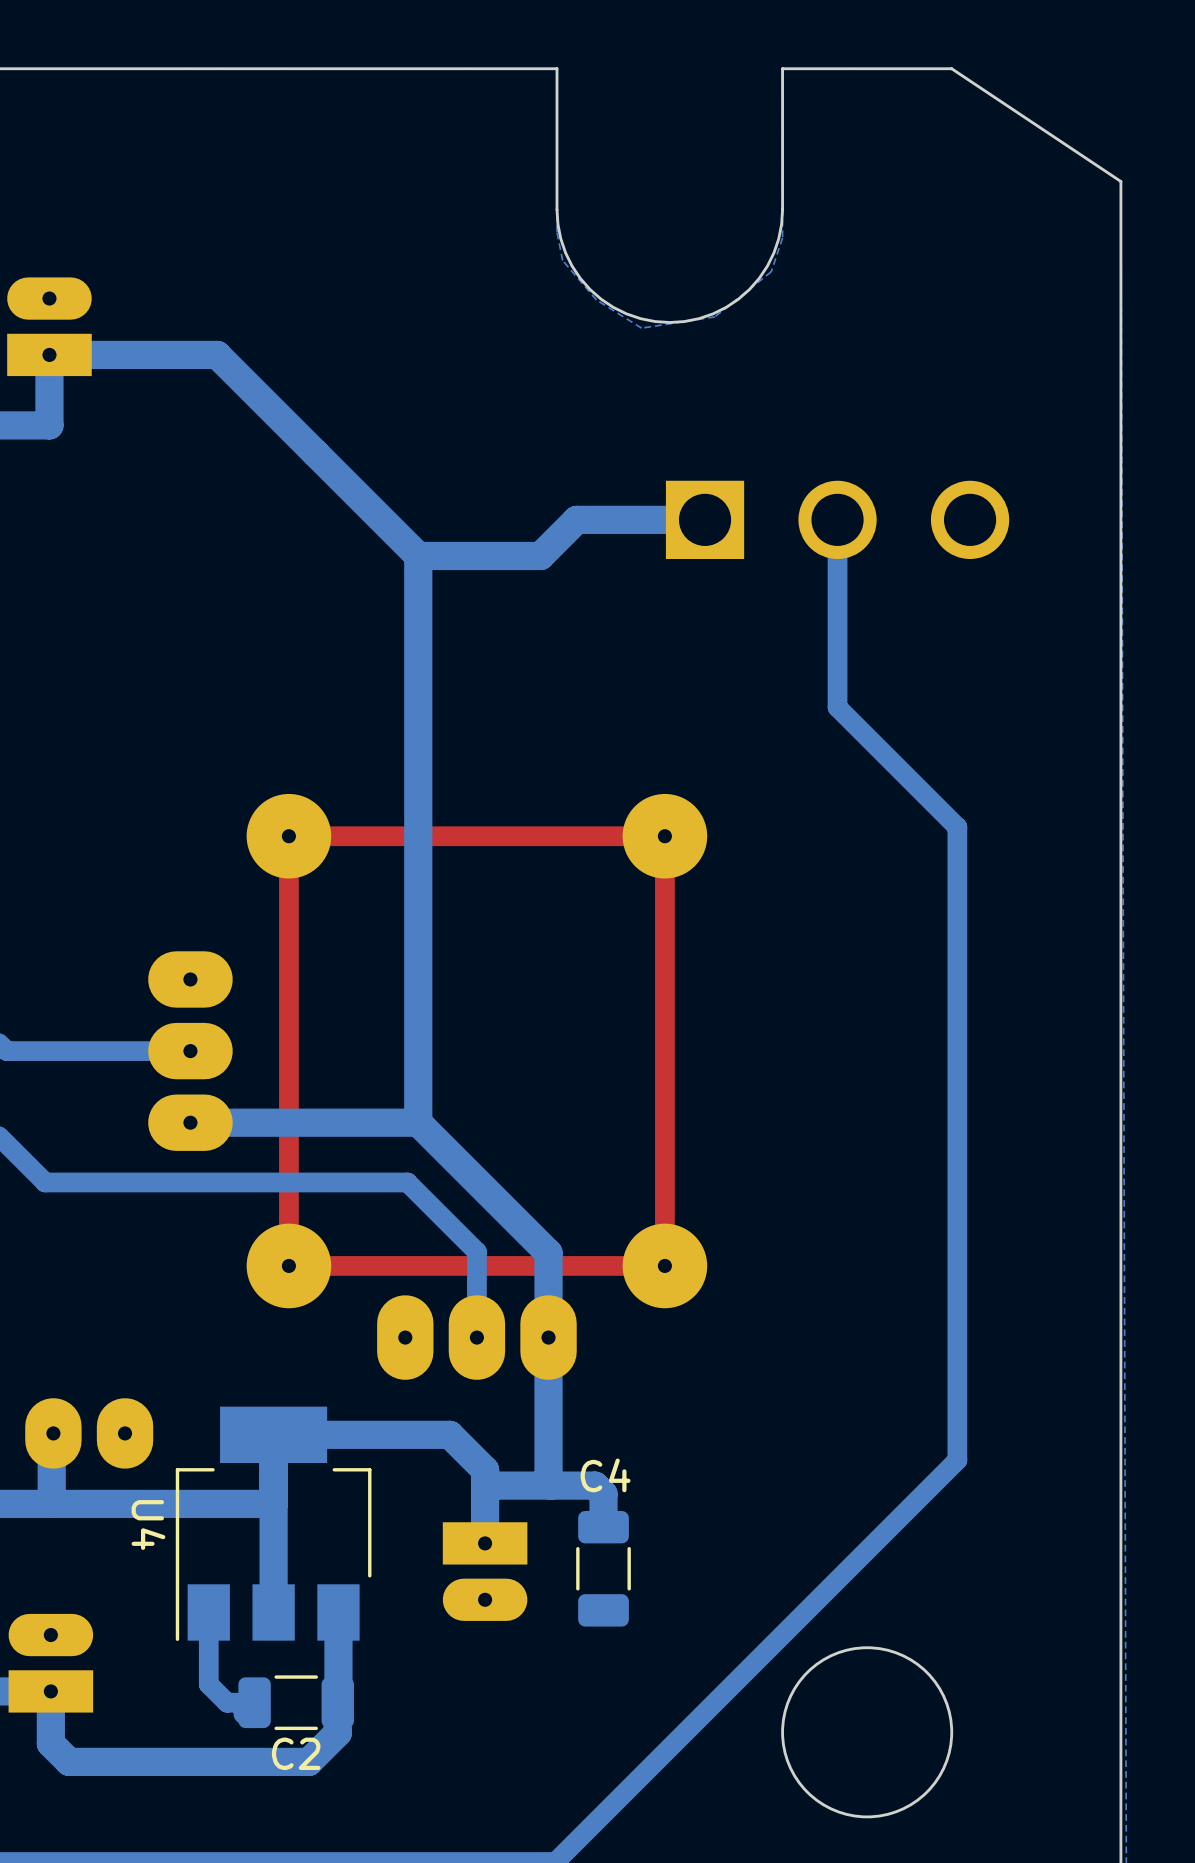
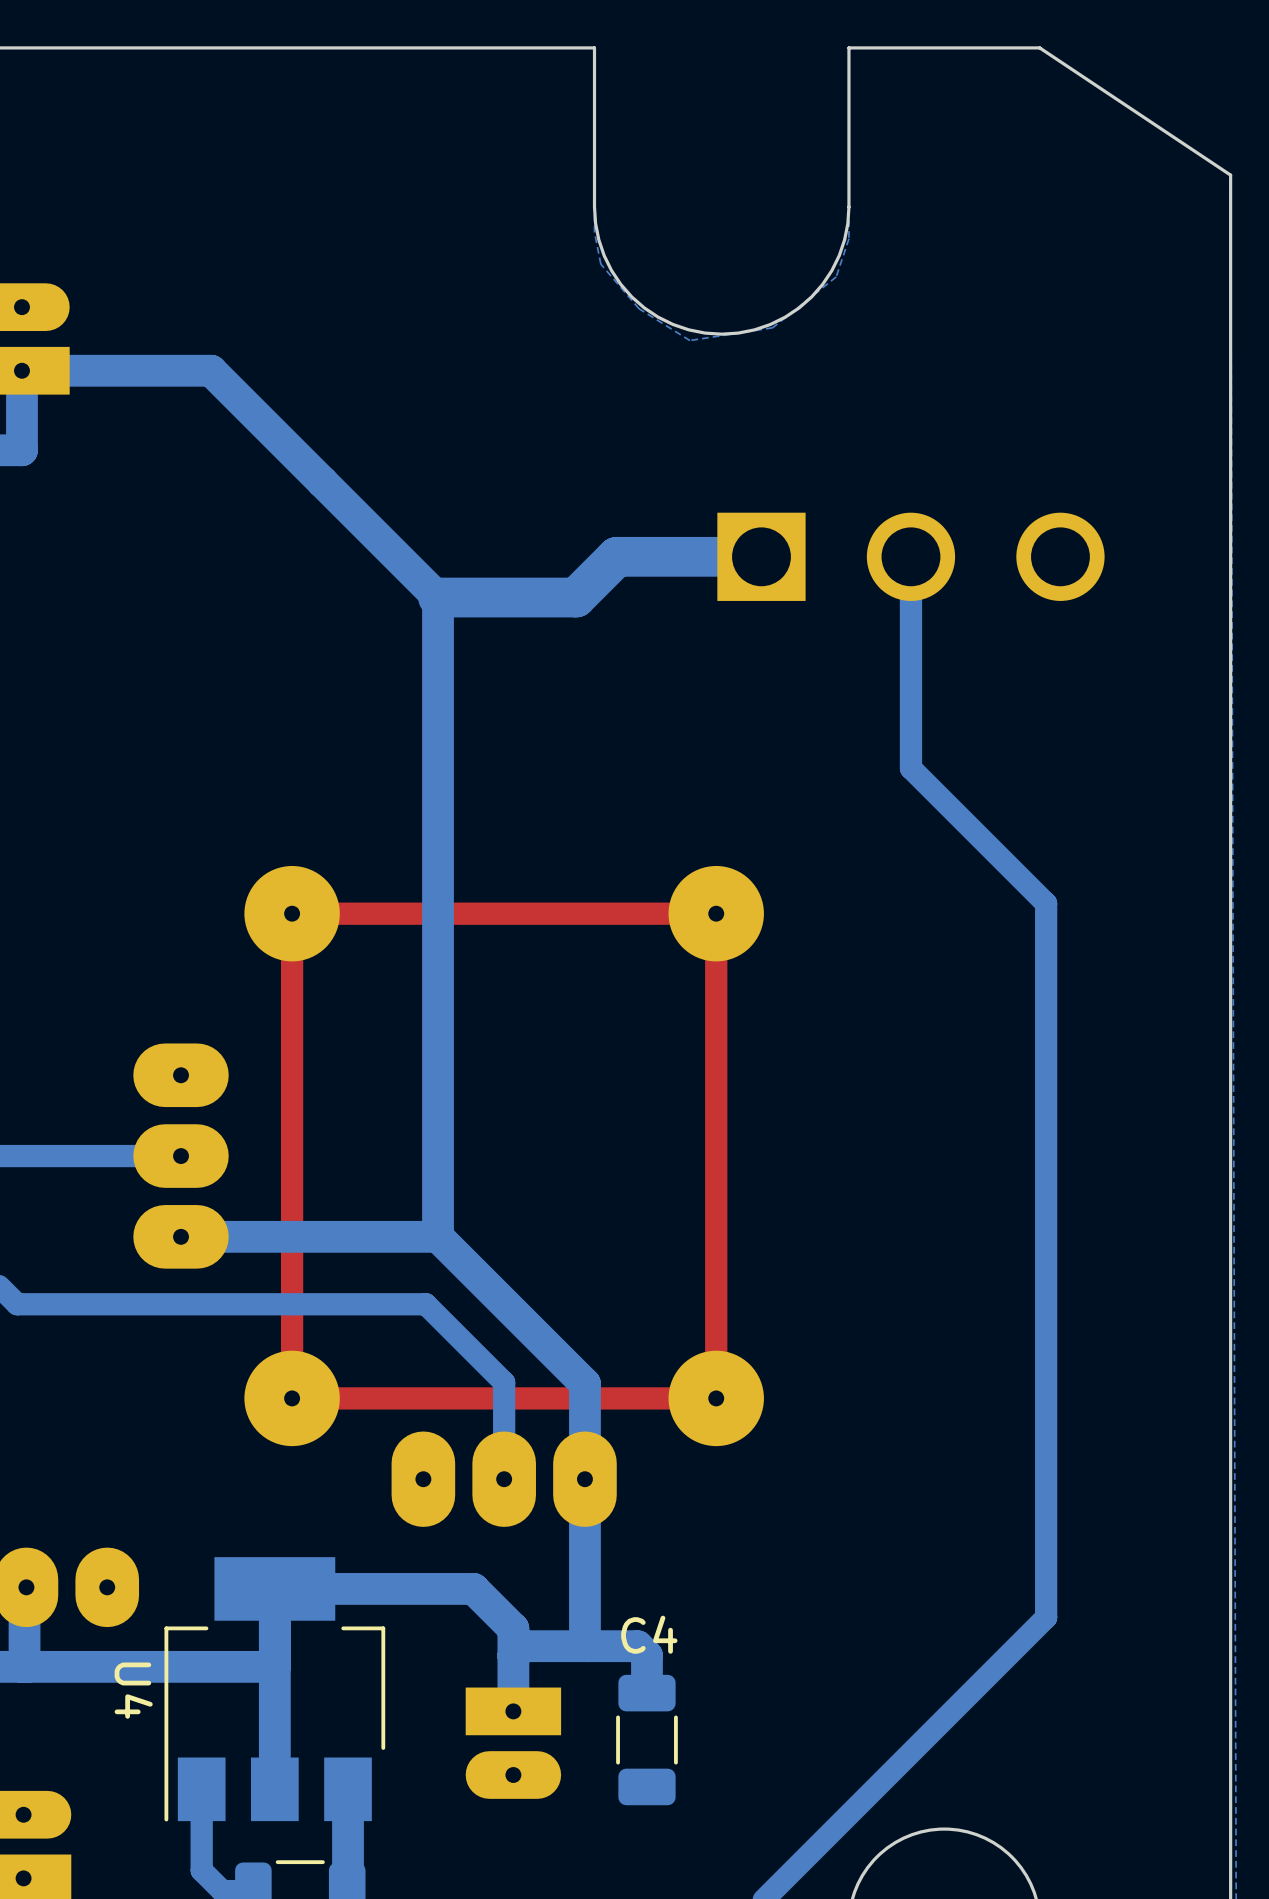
bottom track width: thin (705, 519) (576, 519) (540, 555) (418, 555) -> thick (761, 556) (616, 556) (576, 597) (438, 597)

